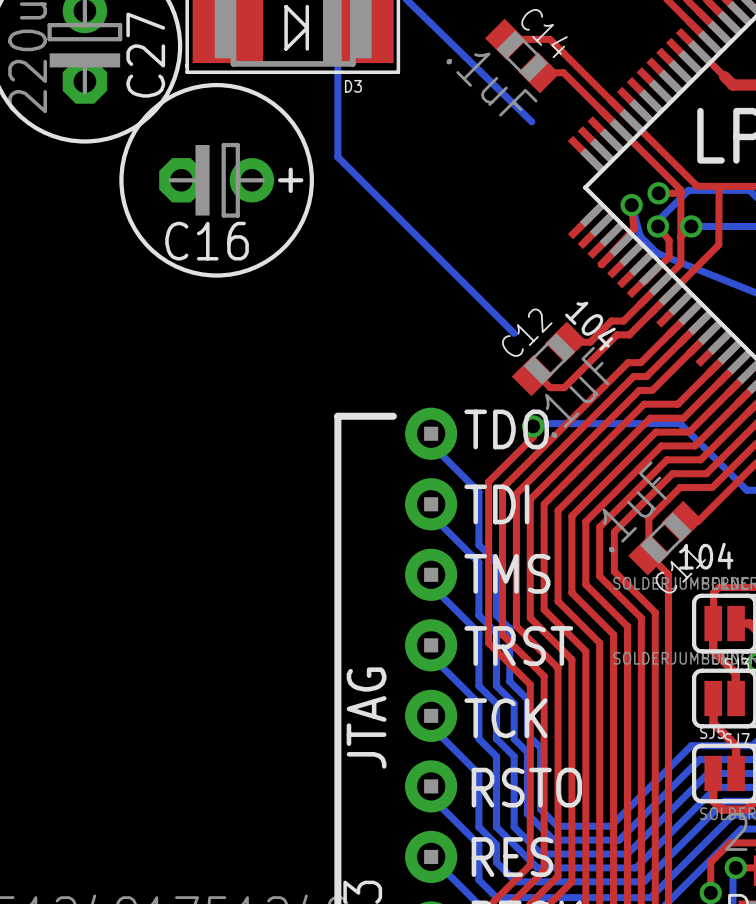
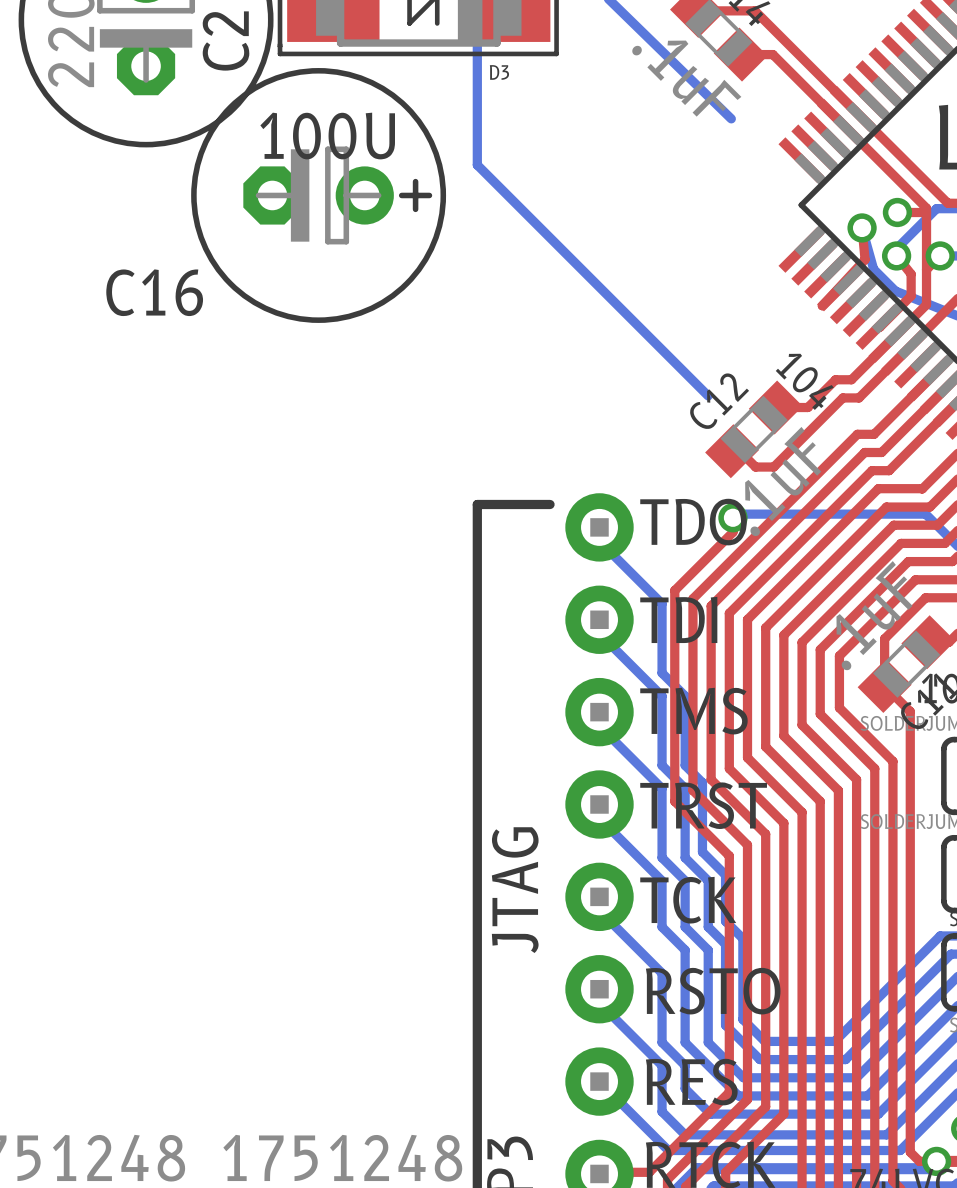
text: none -> 100U (327, 136)
C16 name position: C16 (207, 241) -> C16 (154, 292)

